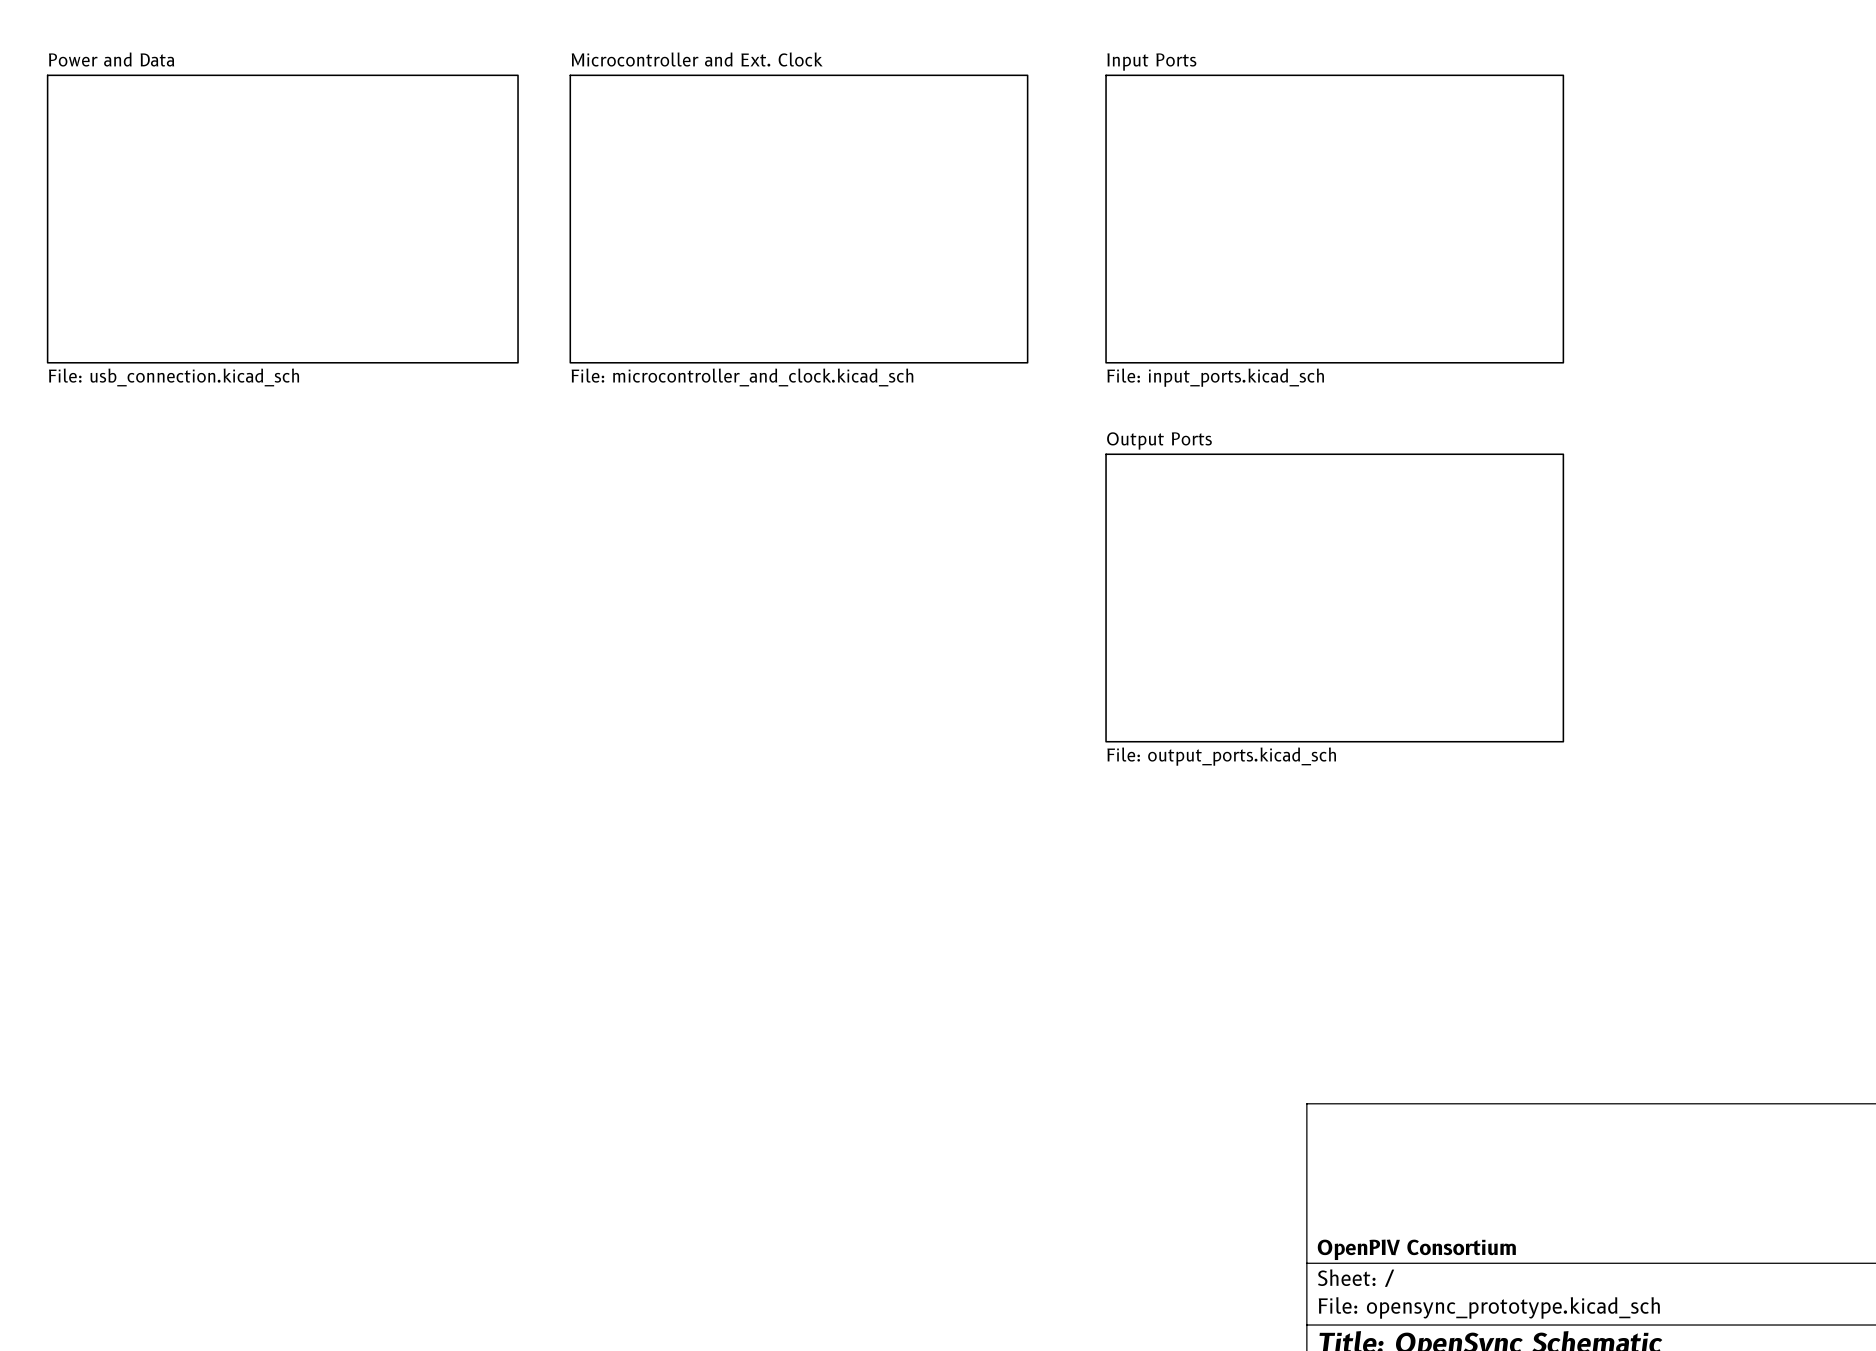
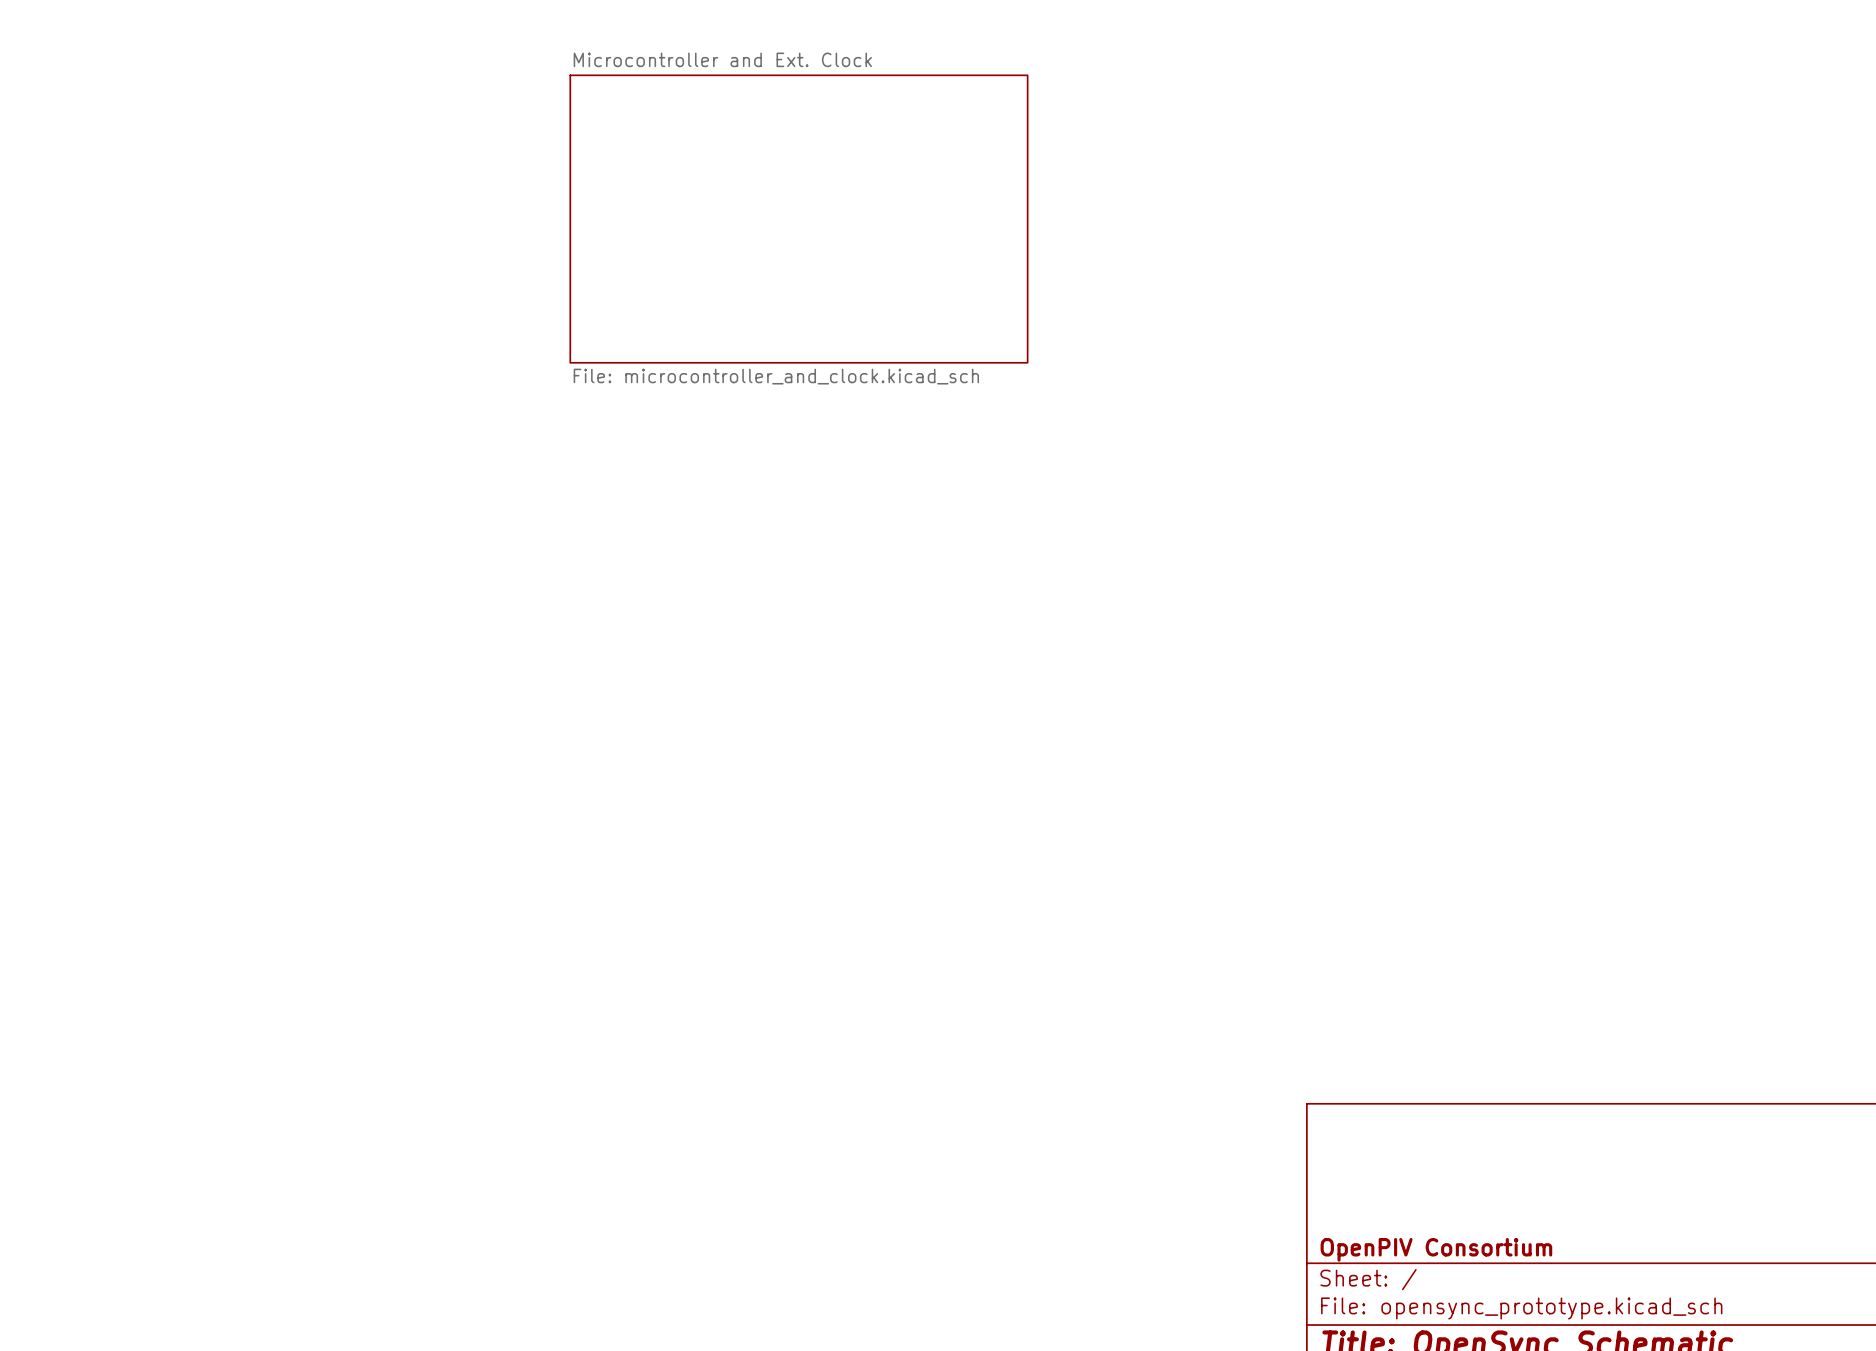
sheet Power and Data: File: usb_connection.kicad_sch (282, 219) -> none
sheet Input Ports: File: input_ports.kicad_sch (1334, 219) -> none
sheet Output Ports: File: output_ports.kicad_sch (1334, 597) -> none

